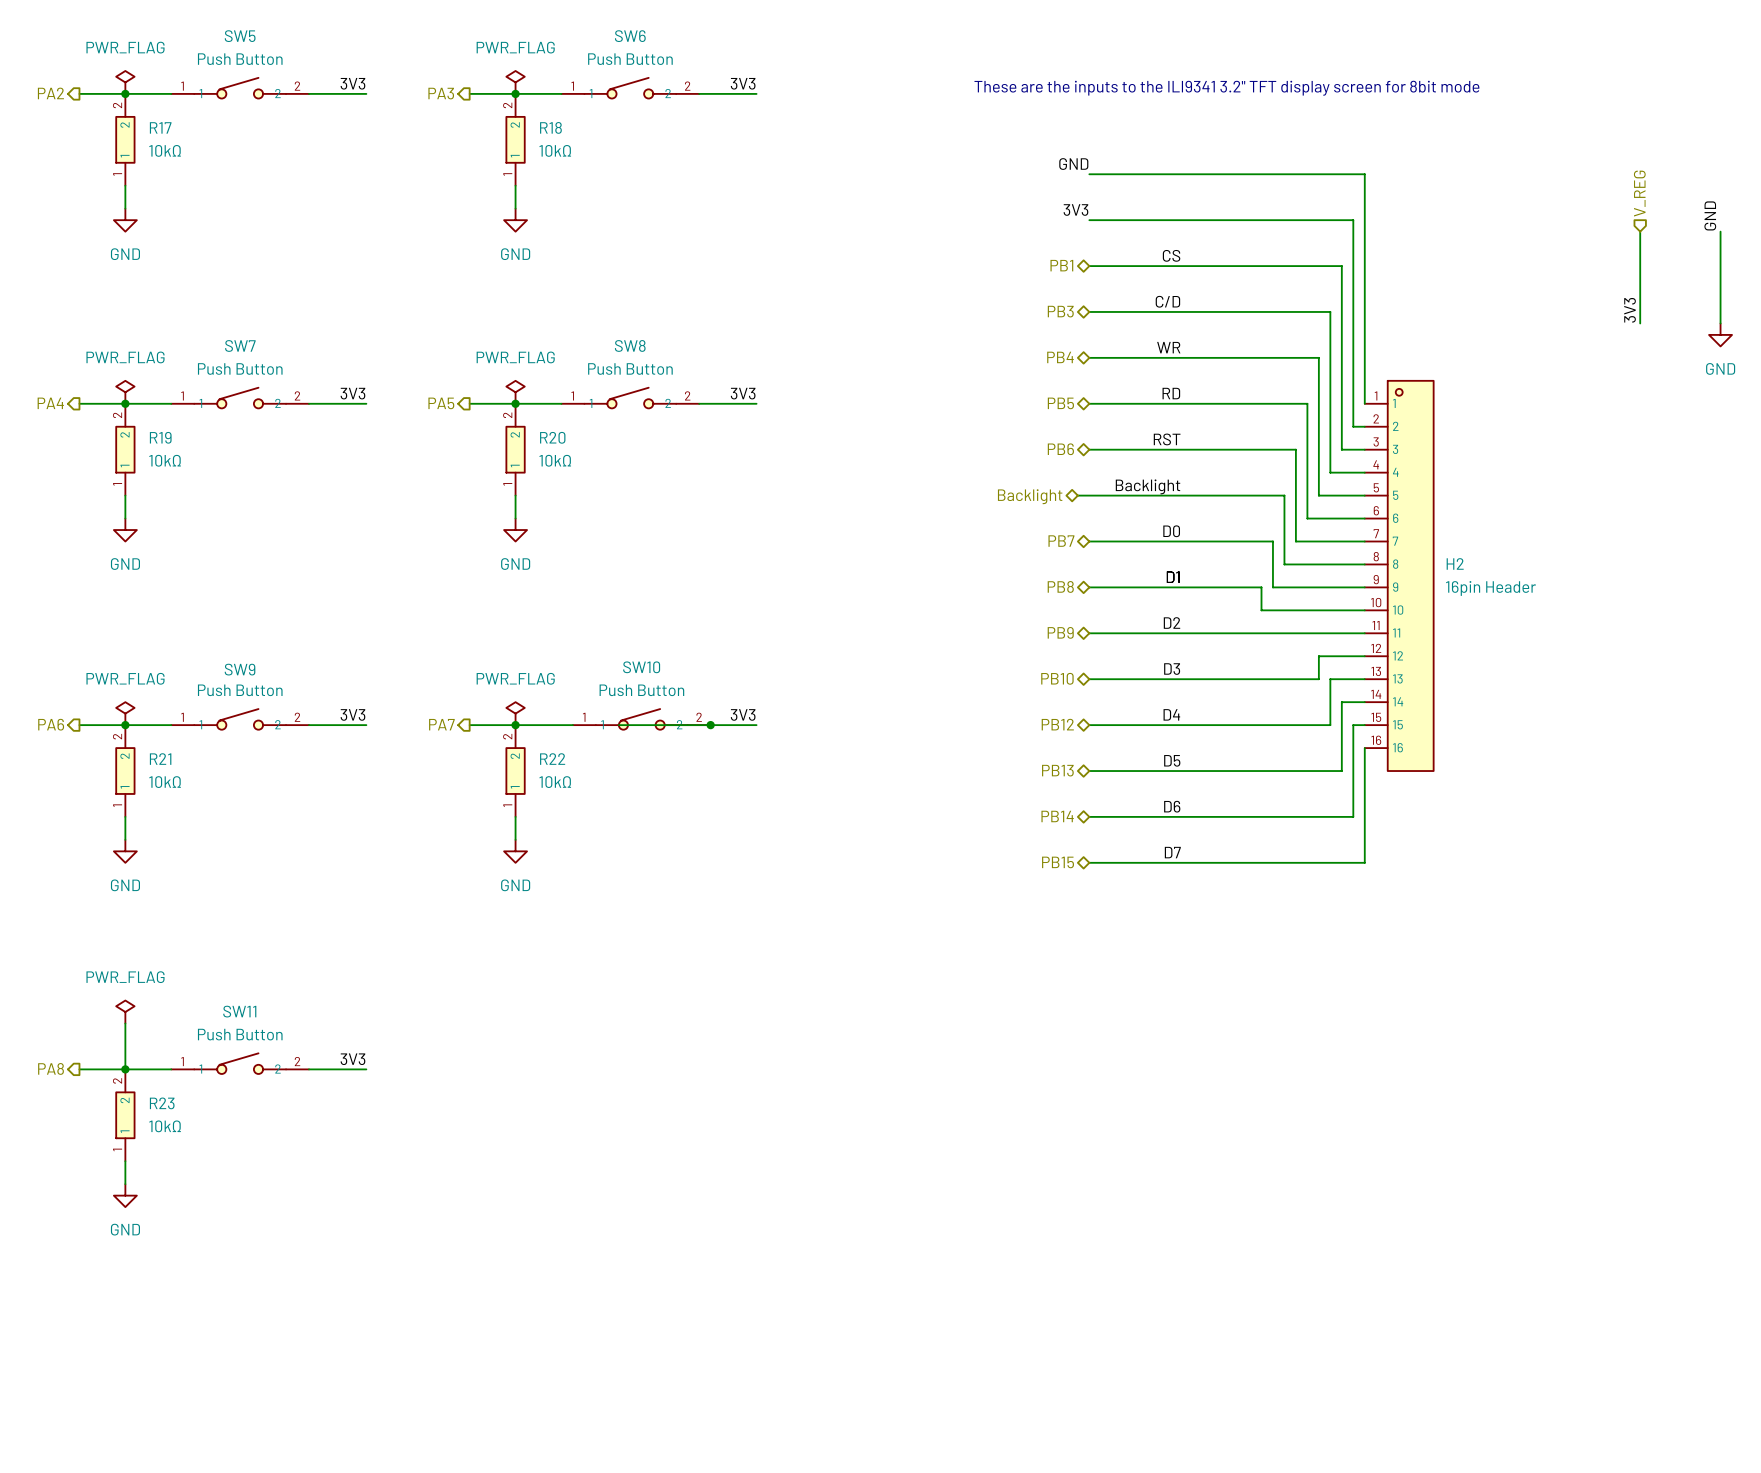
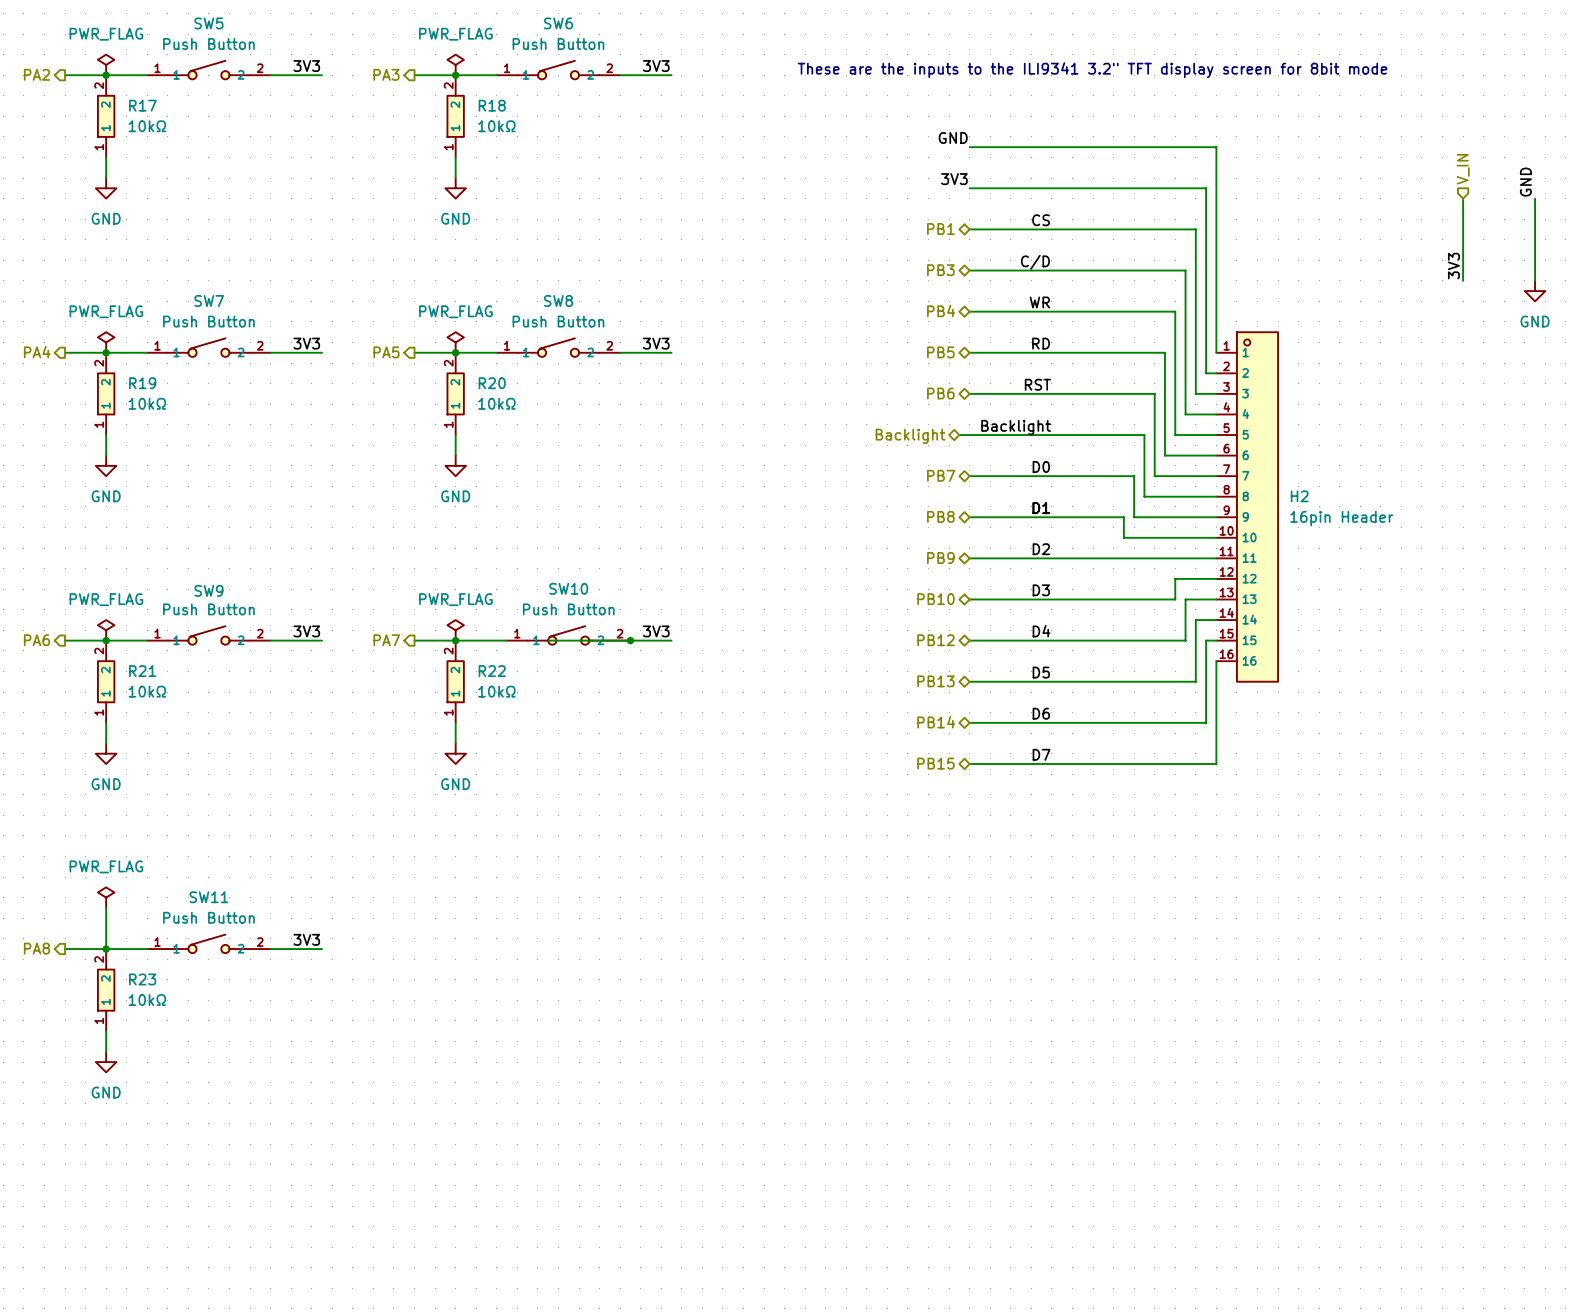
hierarchical label: V_REG (1639, 193) -> V_IN (1463, 169)

